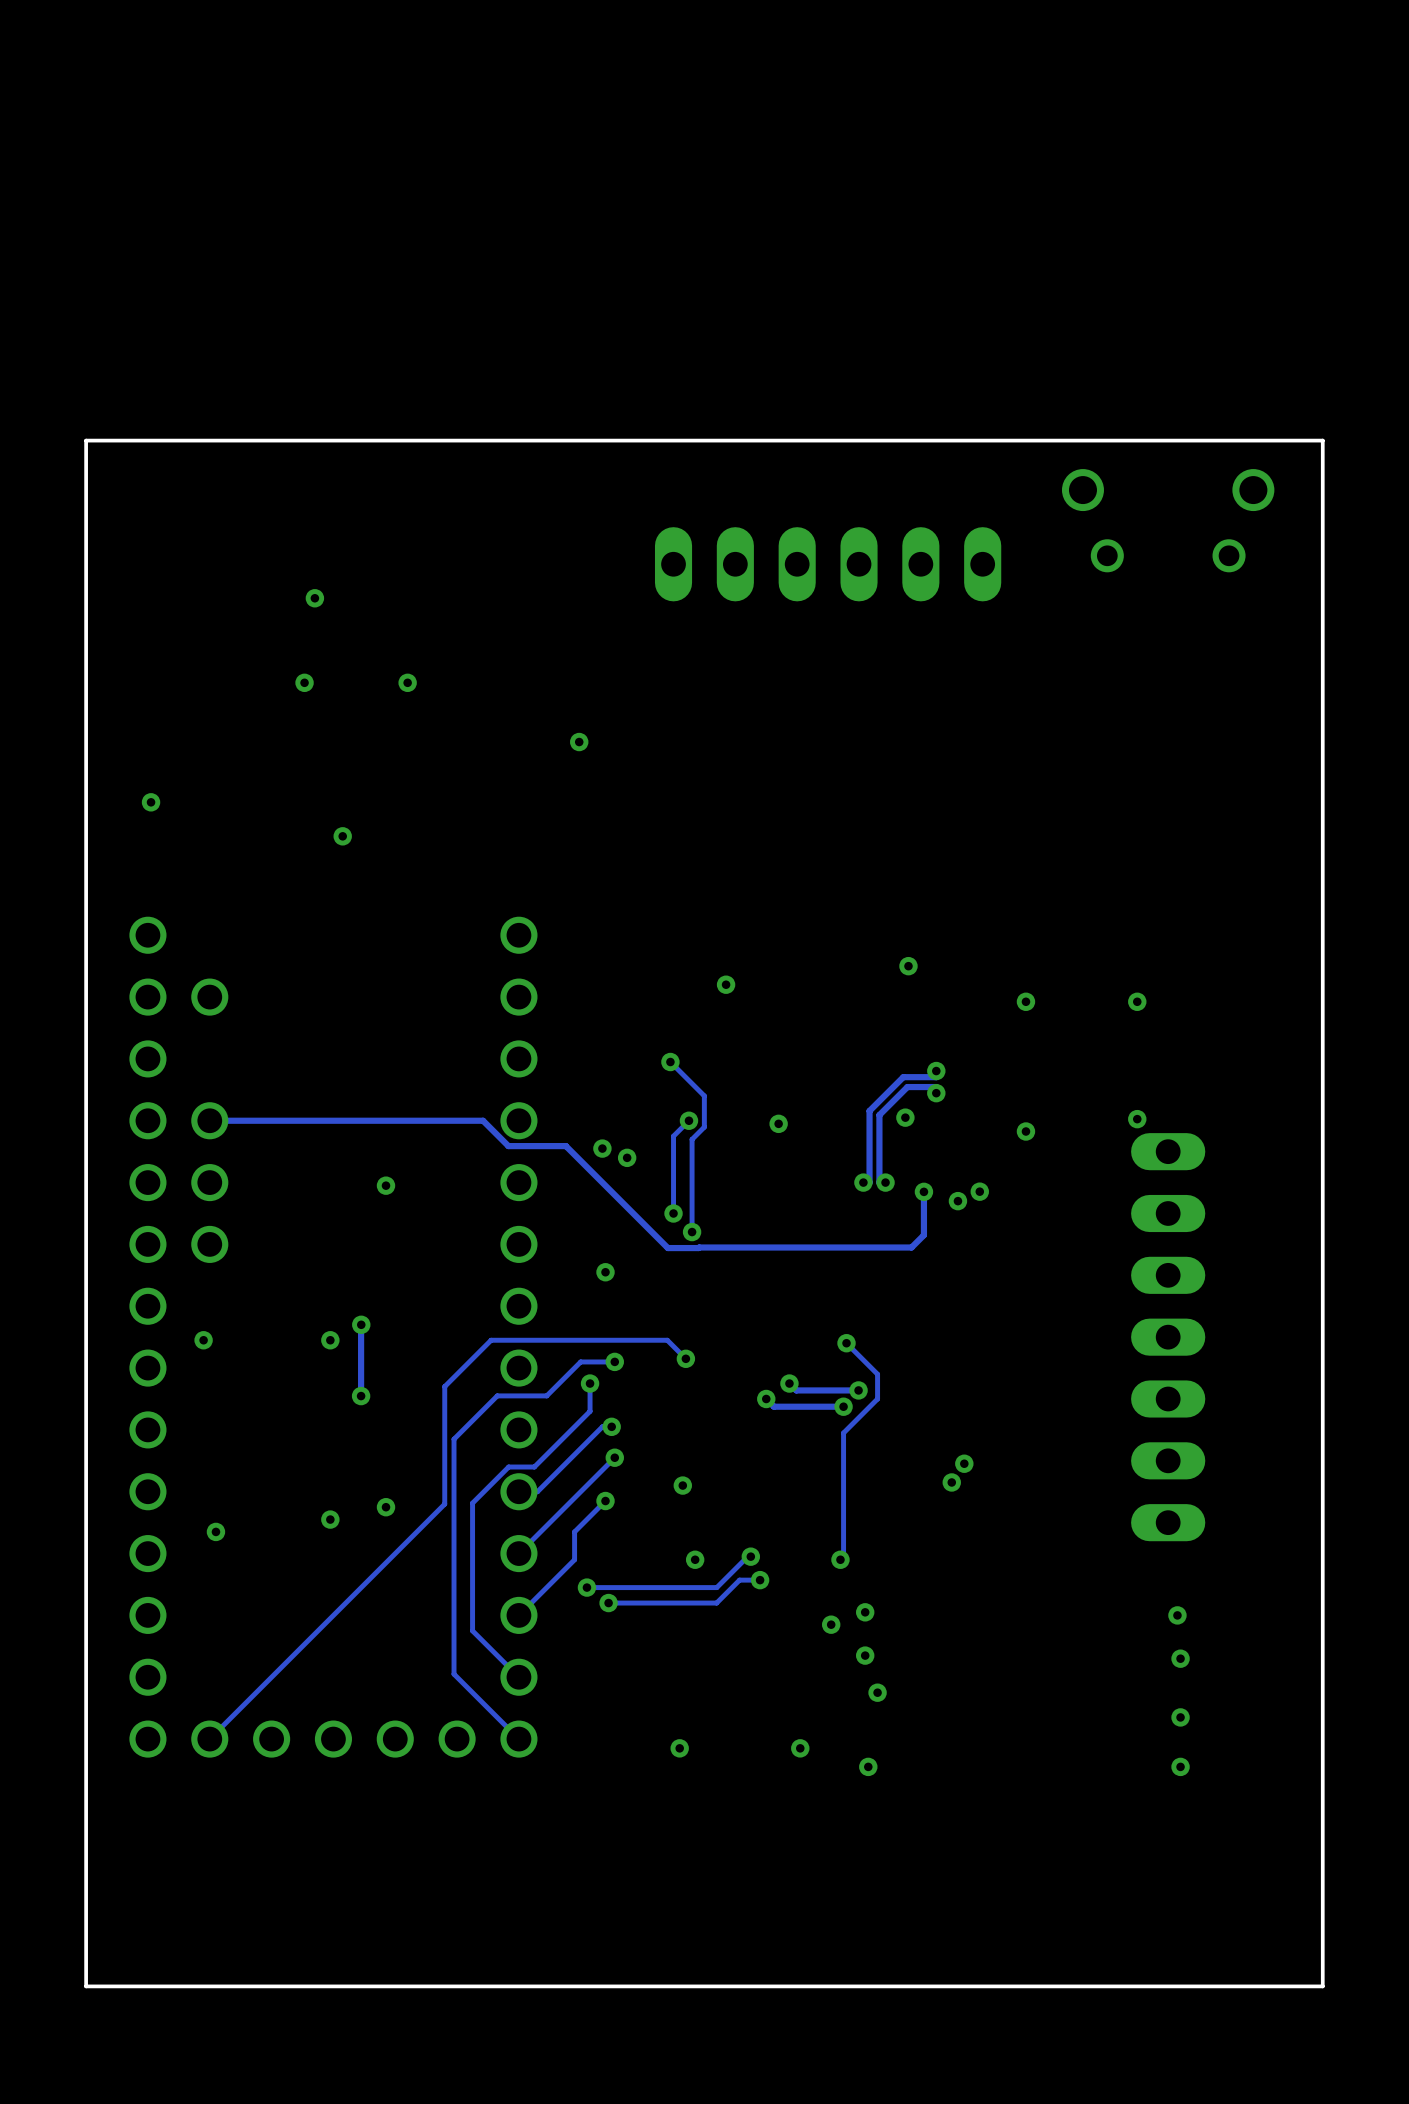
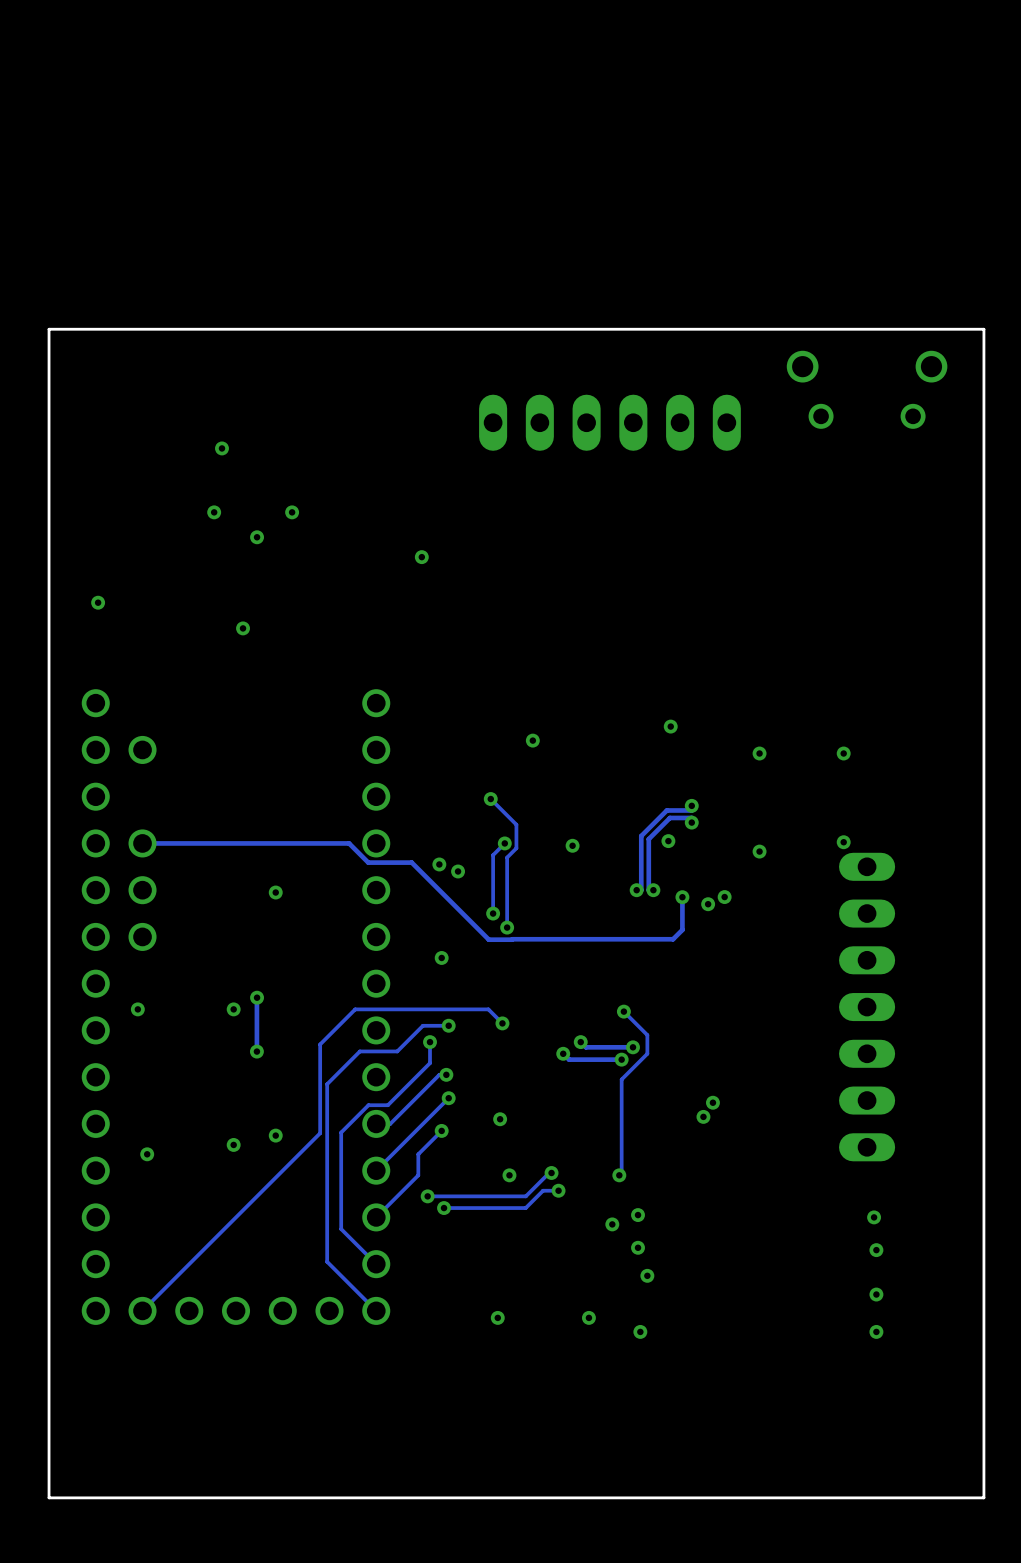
via: none -> (257, 537)

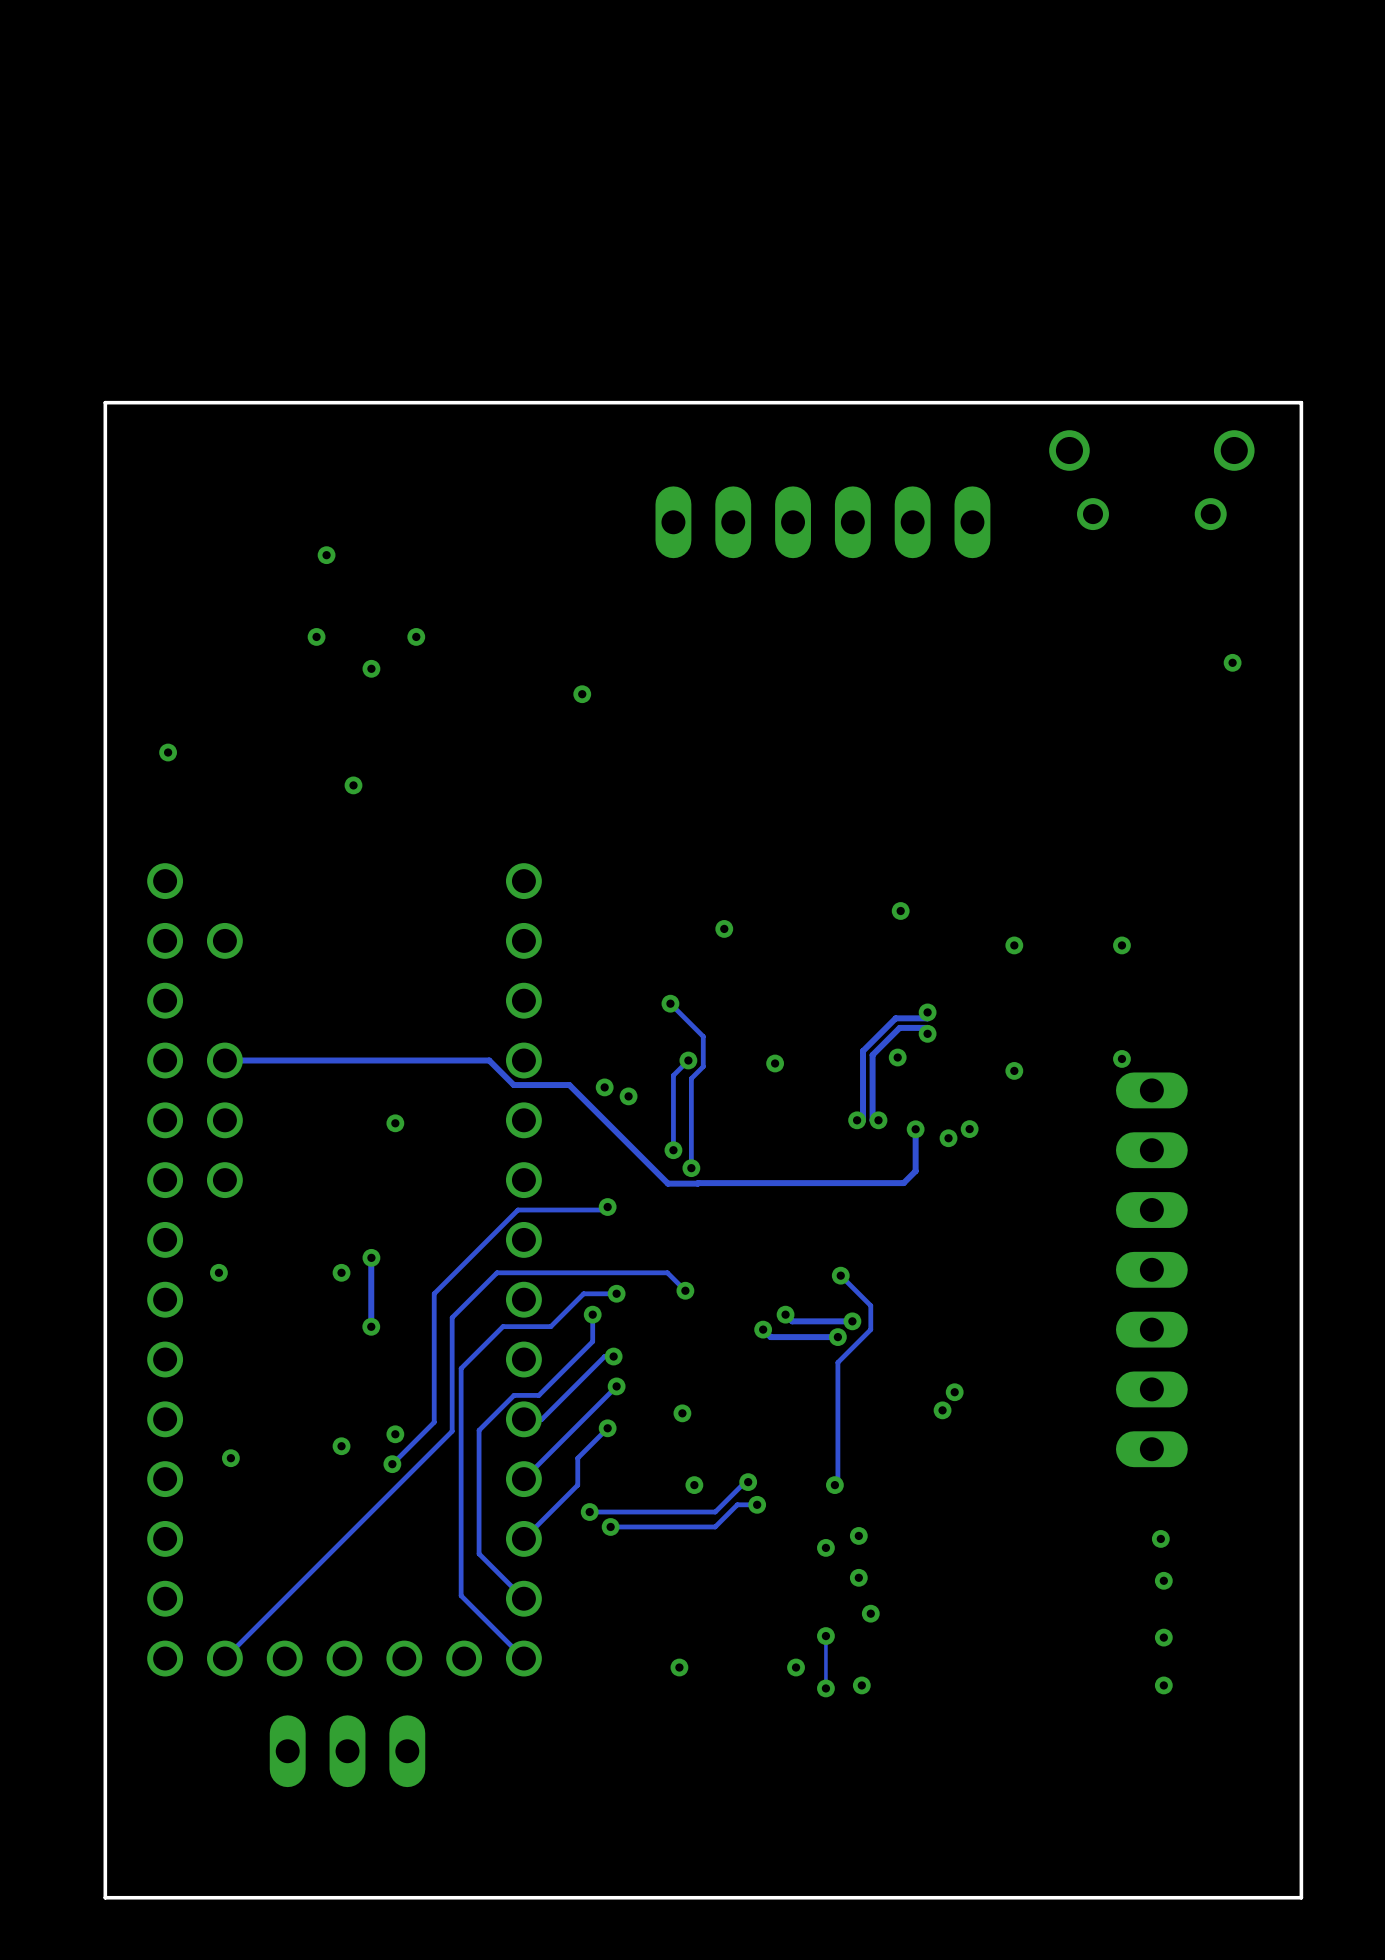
via: none -> (1232, 662)
track: none -> (607, 1207) (604, 1210) (517, 1210) (434, 1293) (434, 1422) (392, 1464)
via: none -> (392, 1464)
track: none -> (825, 1636) (825, 1688)
via: none -> (825, 1636)
via: none -> (825, 1688)
part: none -> (347, 1751)

